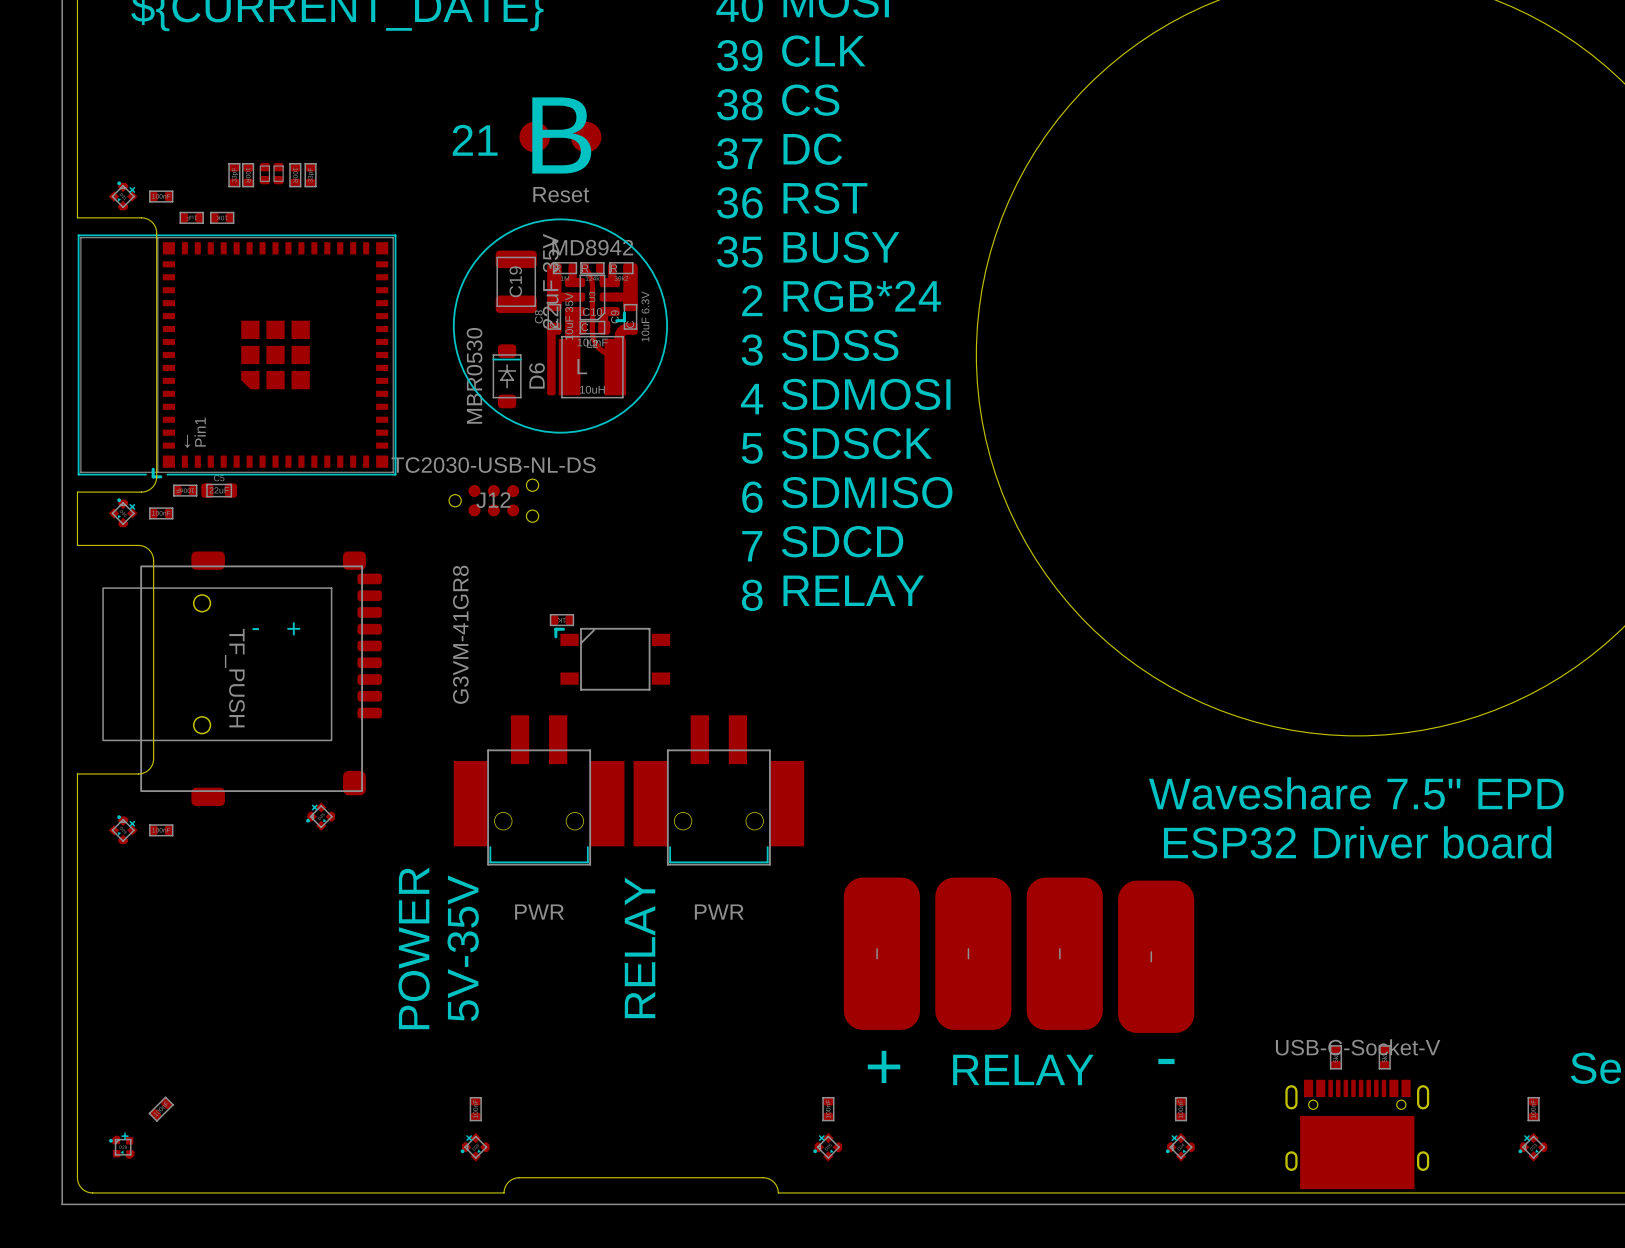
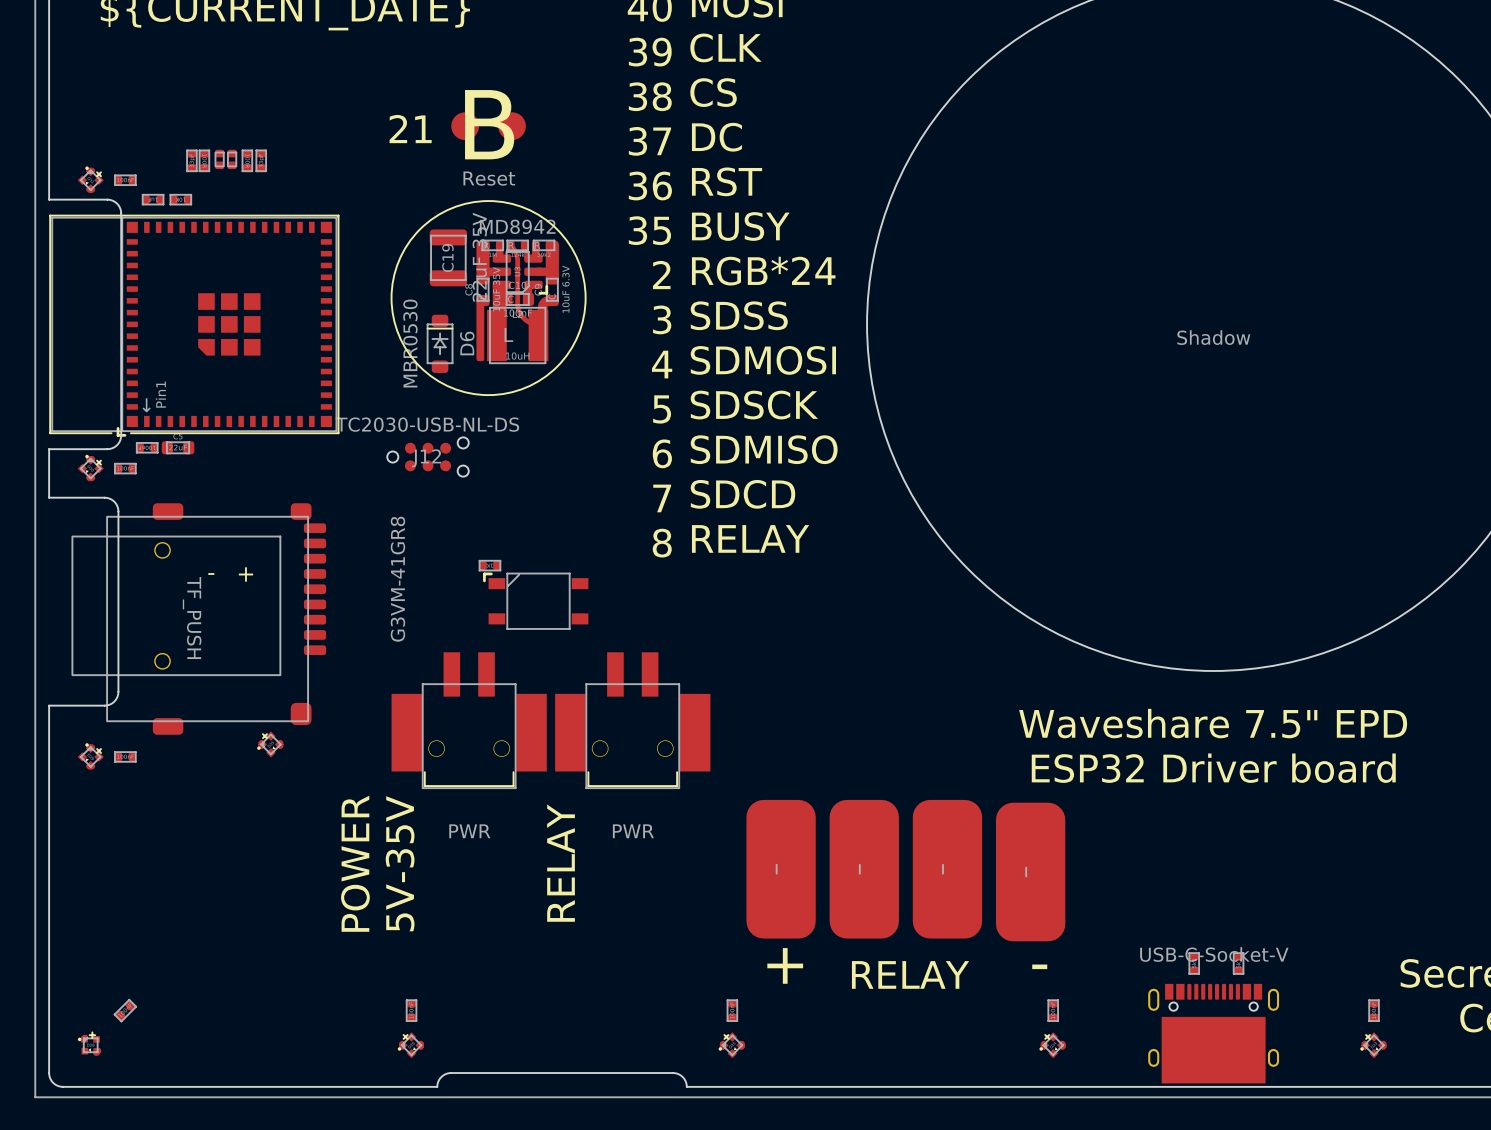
drawing: none -> [1177, 330, 1251, 345]

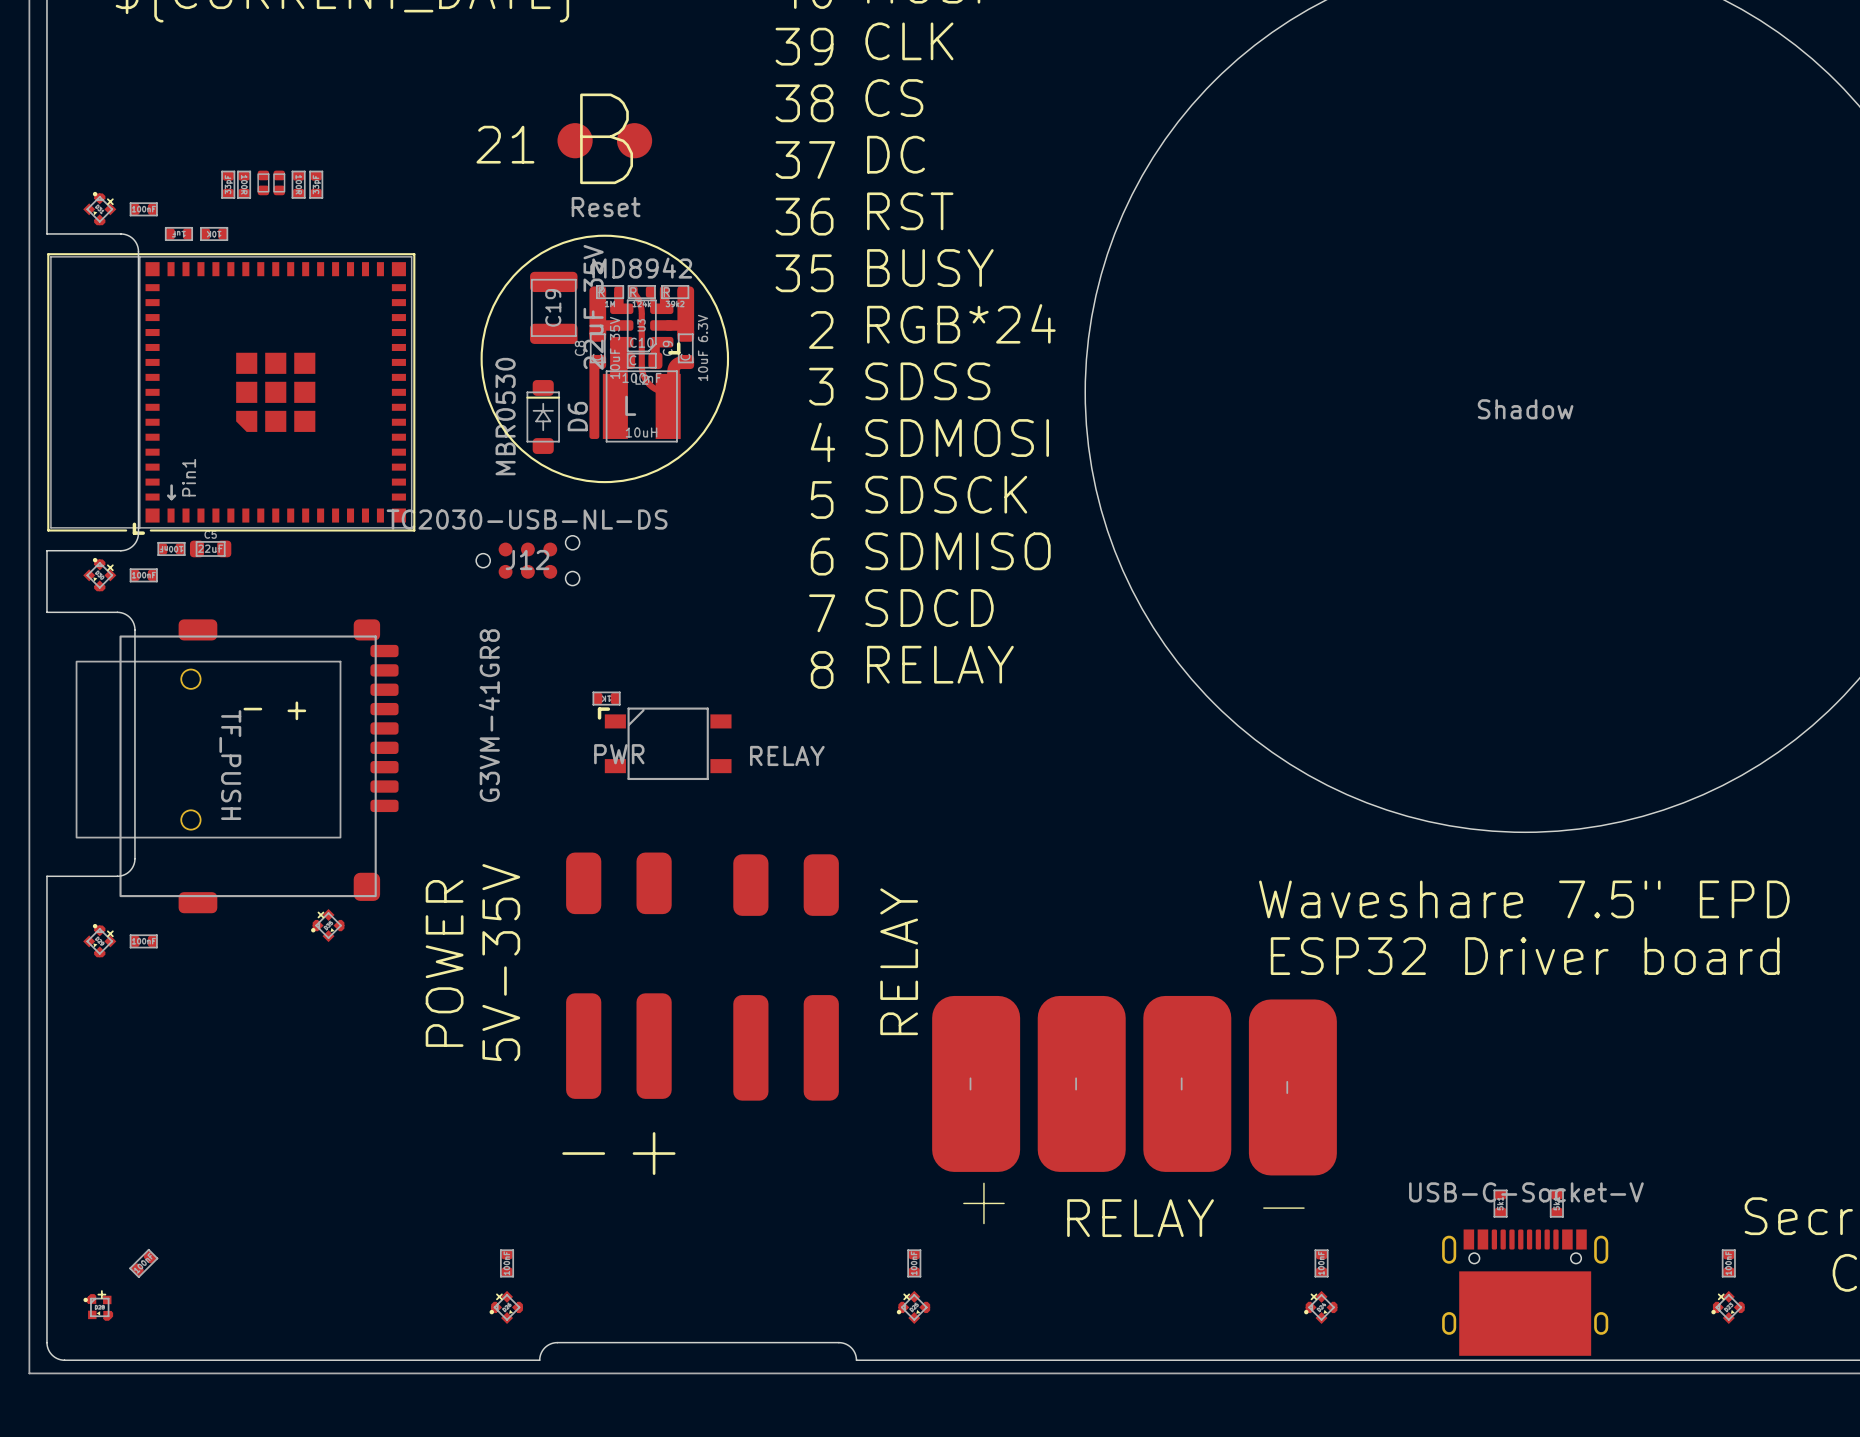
part: PWR (469, 720) -> none
part: PWR (632, 720) -> none
part: none -> PWR (618, 975)
part: none -> RELAY (786, 977)
text position: POWER (355, 863) -> POWER (444, 963)
text position: 5V-35V (400, 863) -> 5V-35V (501, 962)
text position: RELAY (561, 863) -> RELAY (899, 961)
text: none -> - (583, 1153)
text: none -> + (654, 1153)

